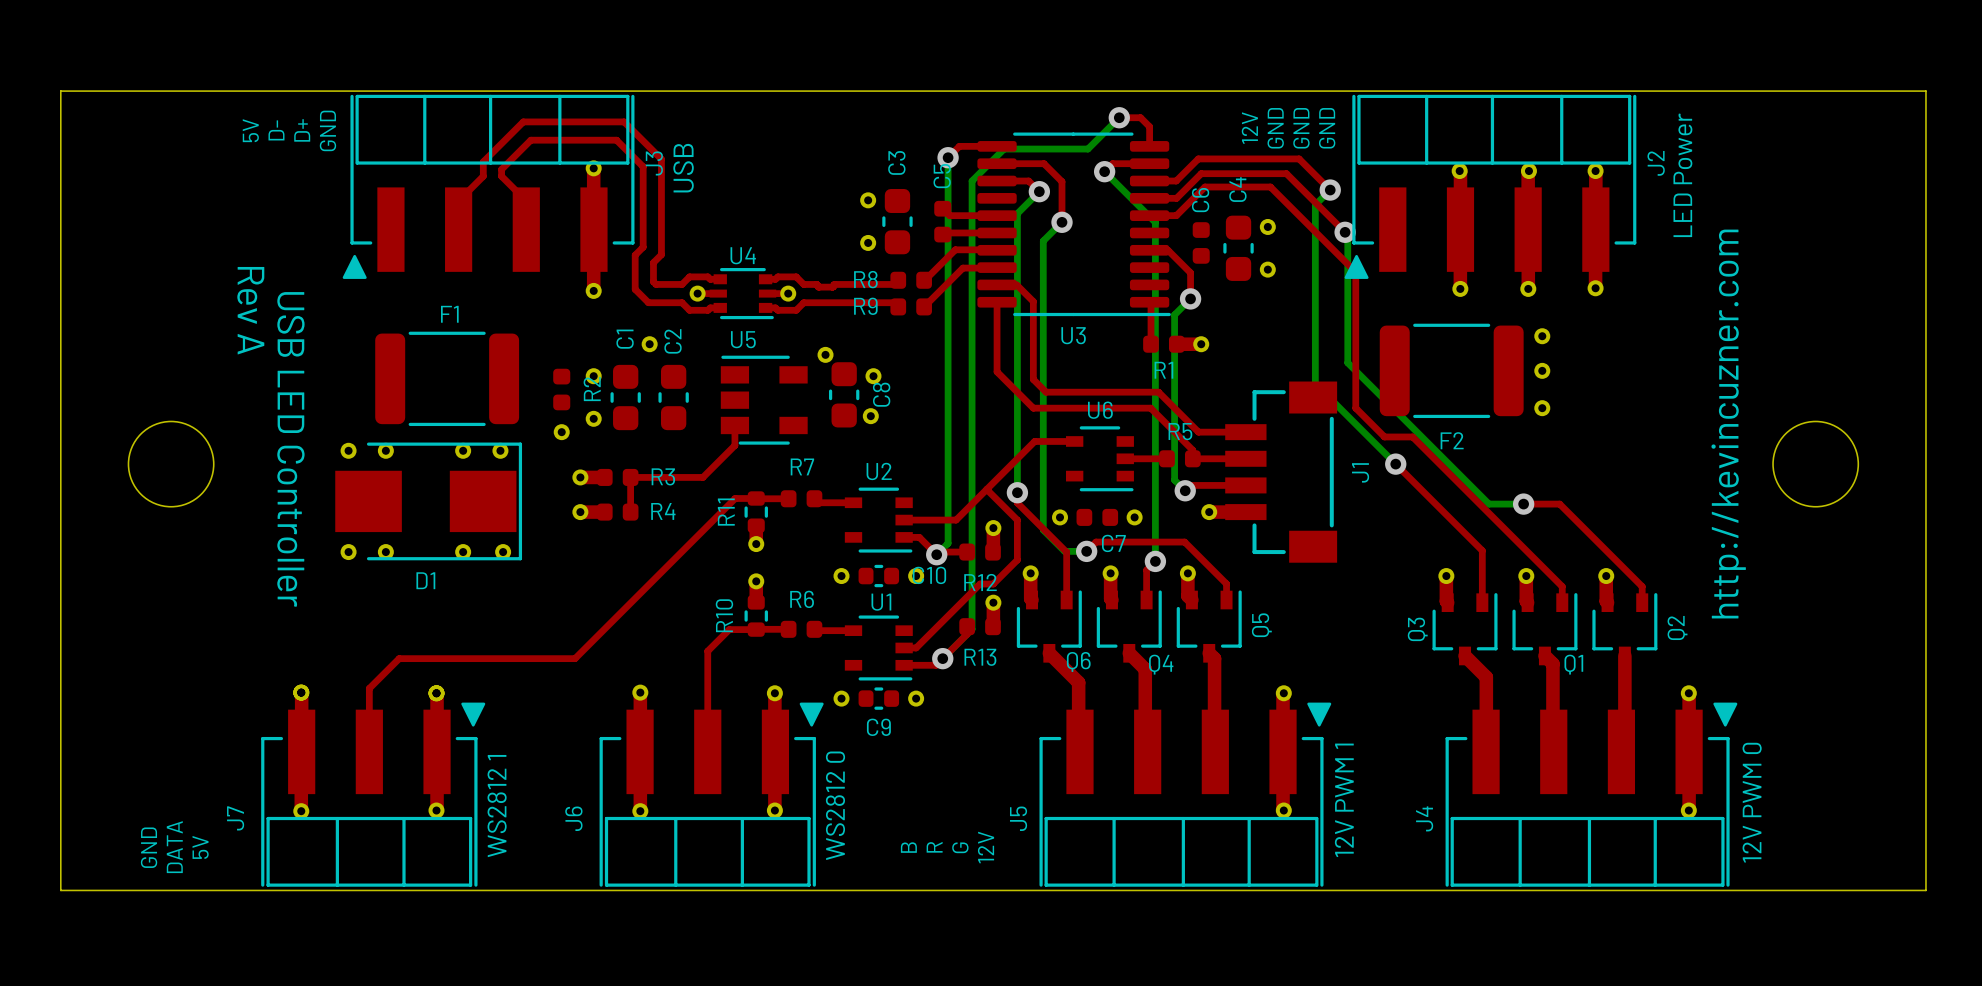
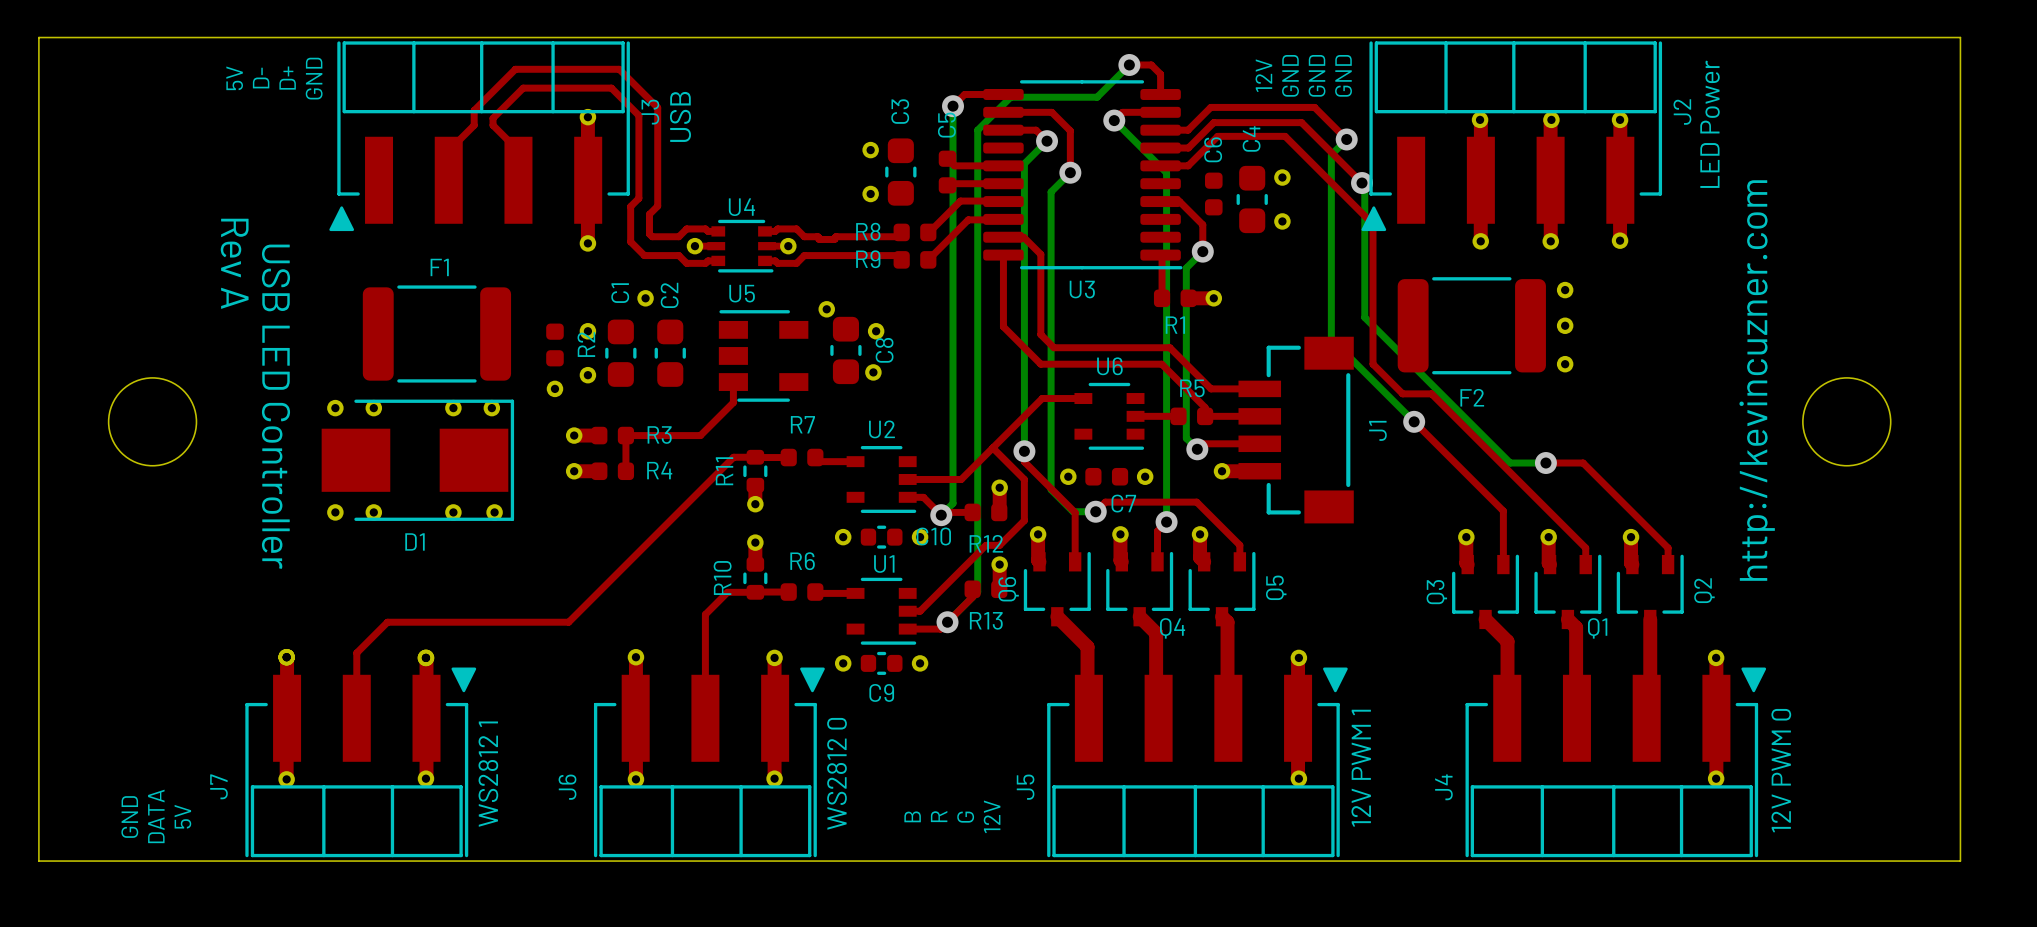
Q6 name rotation: 0° (1078, 661) -> 90° counterclockwise (1008, 589)
Q6 name position: Q6 (1078, 661) -> Q6 (1008, 589)

